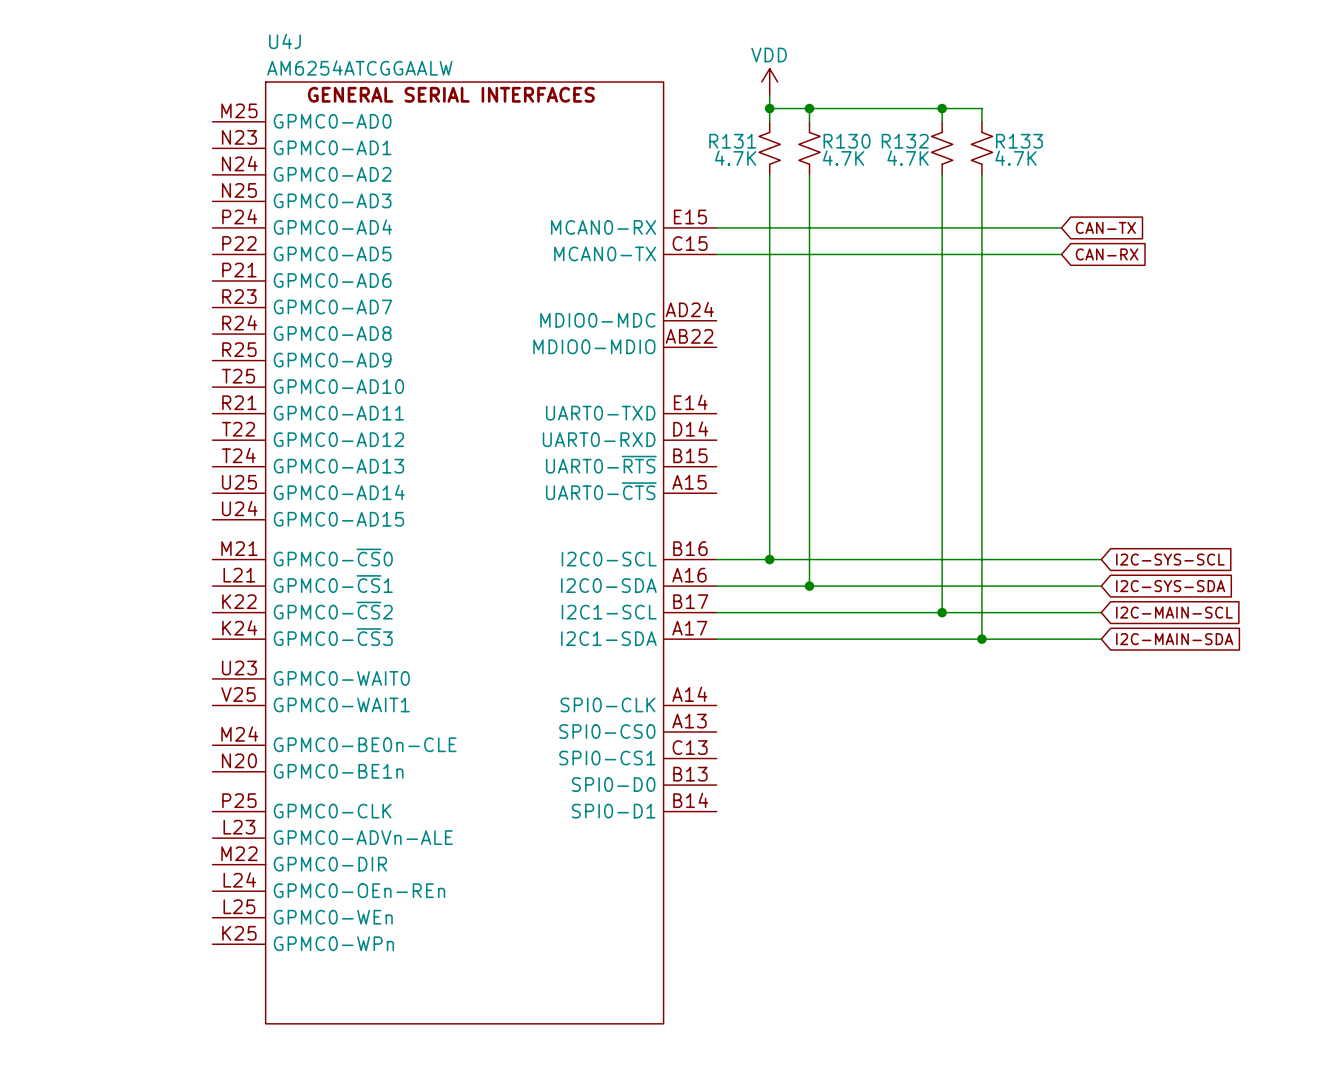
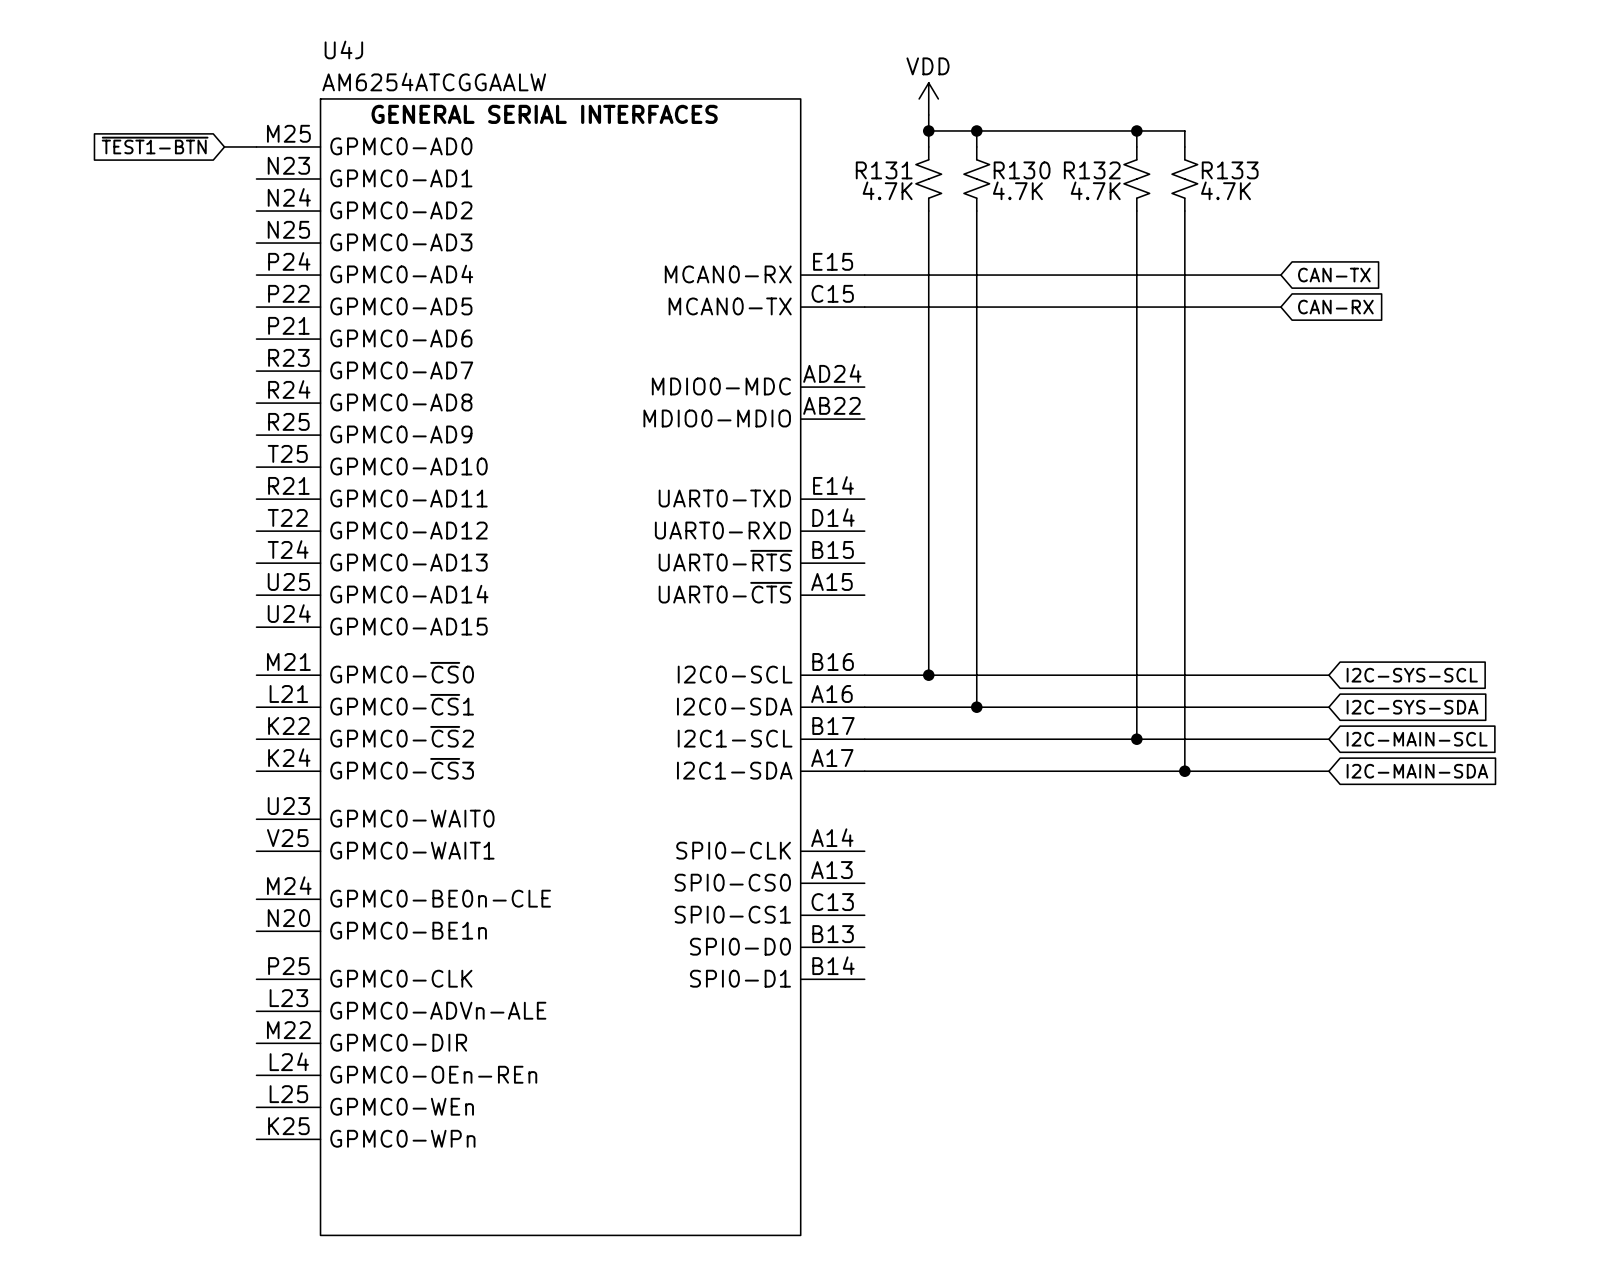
global label: none -> ~{TEST1-BTN} (155, 145)
wire: none -> (224, 146) (256, 146)

